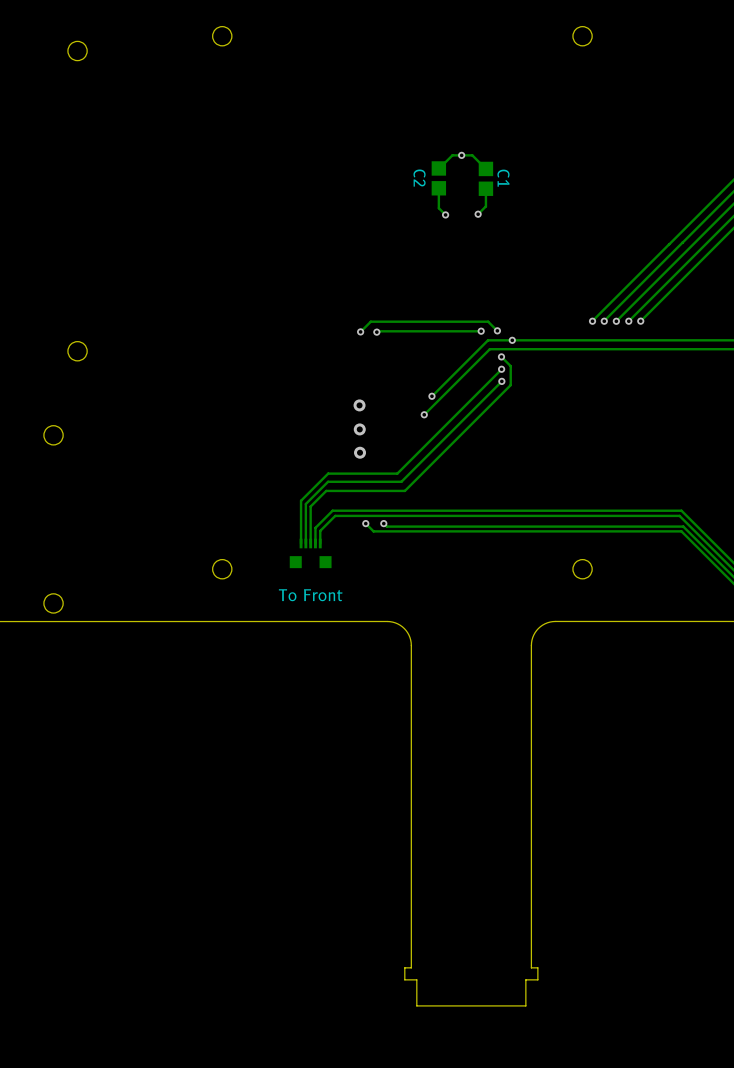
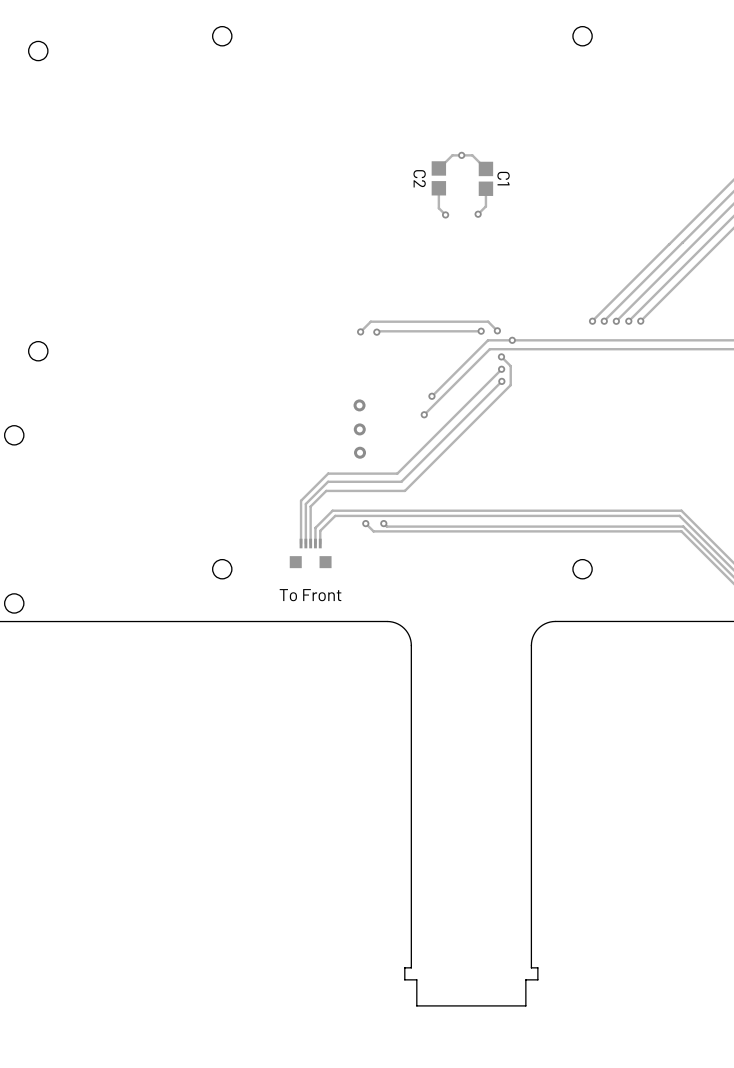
round board edge position: (77, 51) -> (38, 51)
round board edge position: (77, 351) -> (38, 351)
round board edge position: (53, 435) -> (14, 435)
round board edge position: (53, 603) -> (14, 603)

